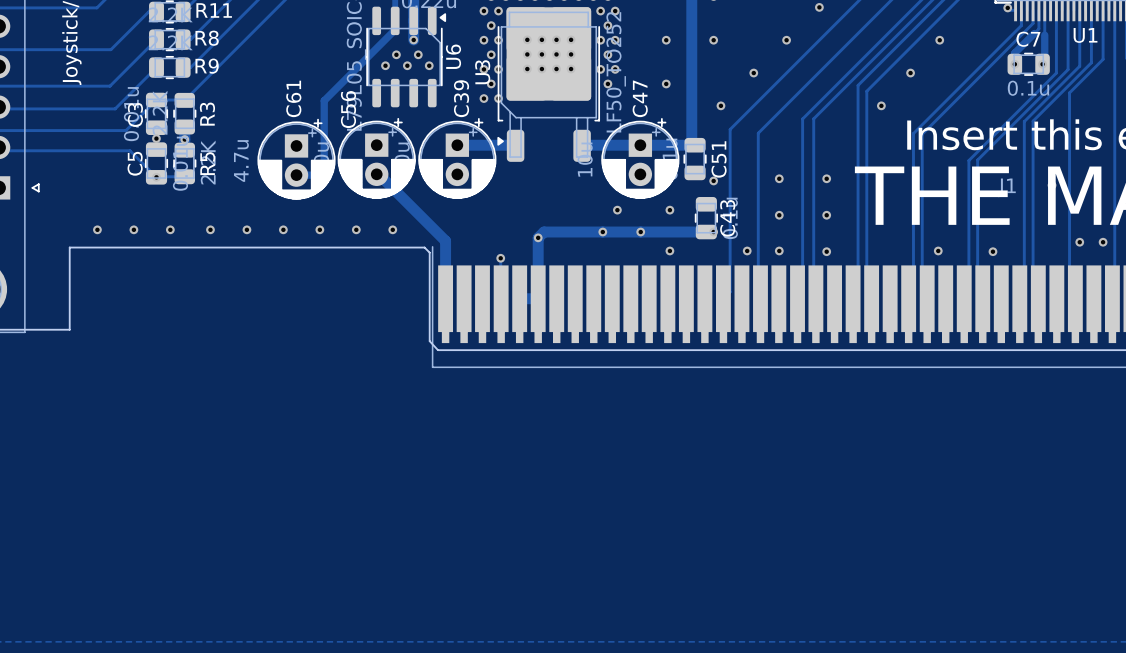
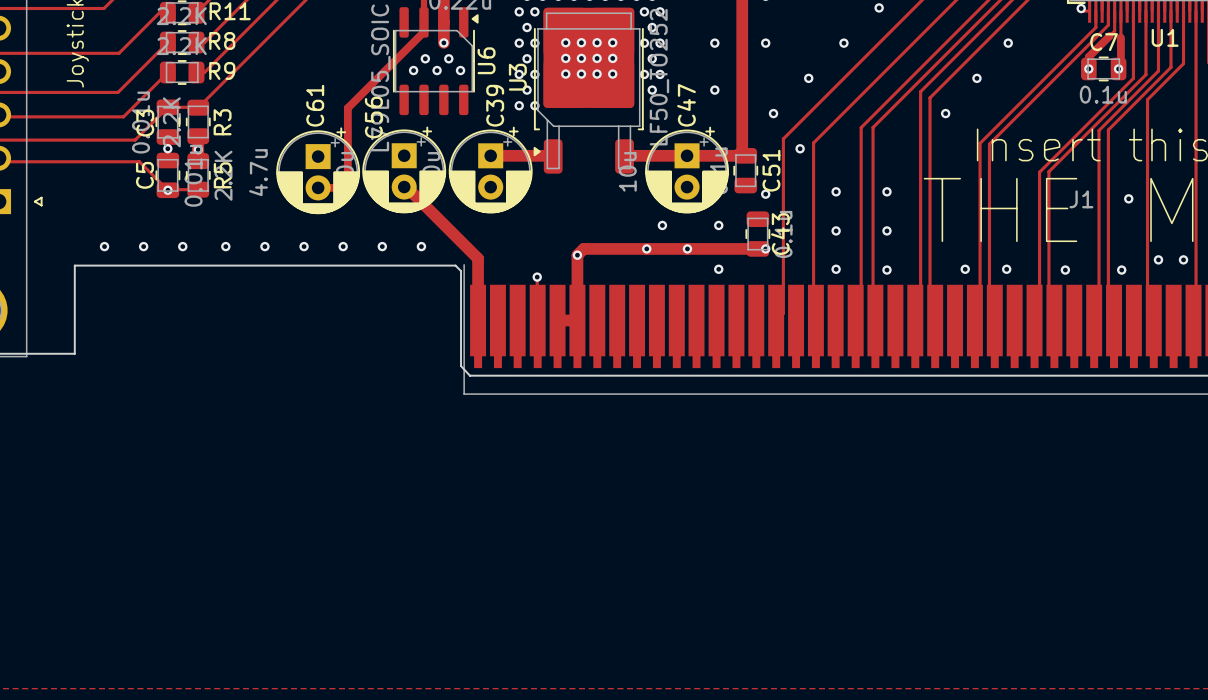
via: none -> (800, 148)
via: (747, 250) -> none
via: none -> (965, 269)
via: none -> (1121, 270)

